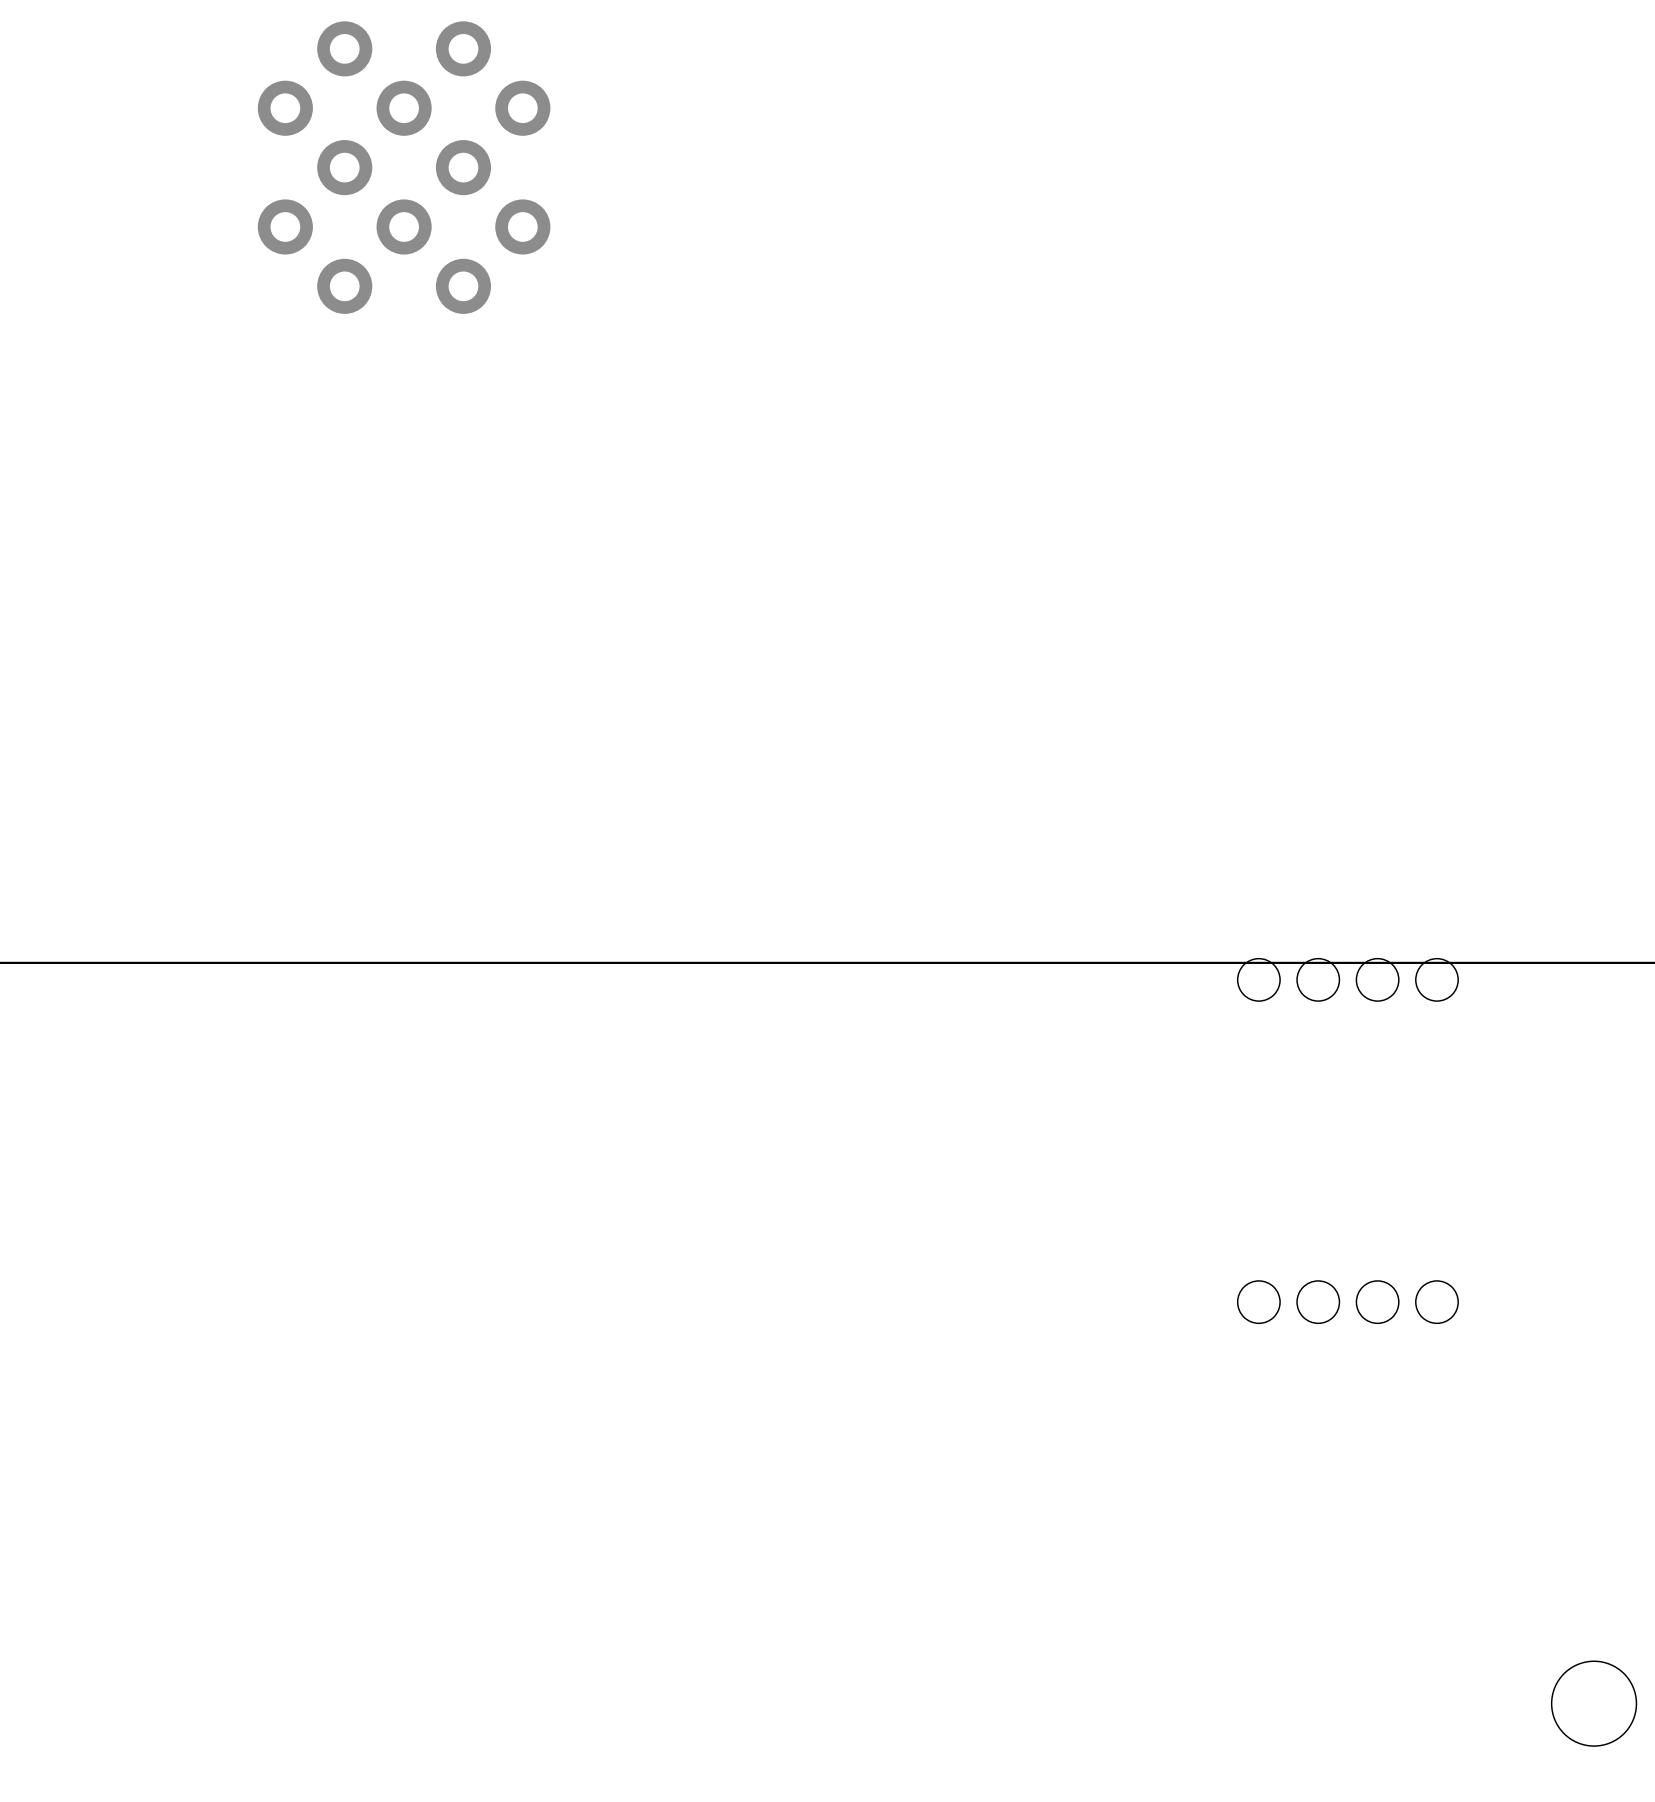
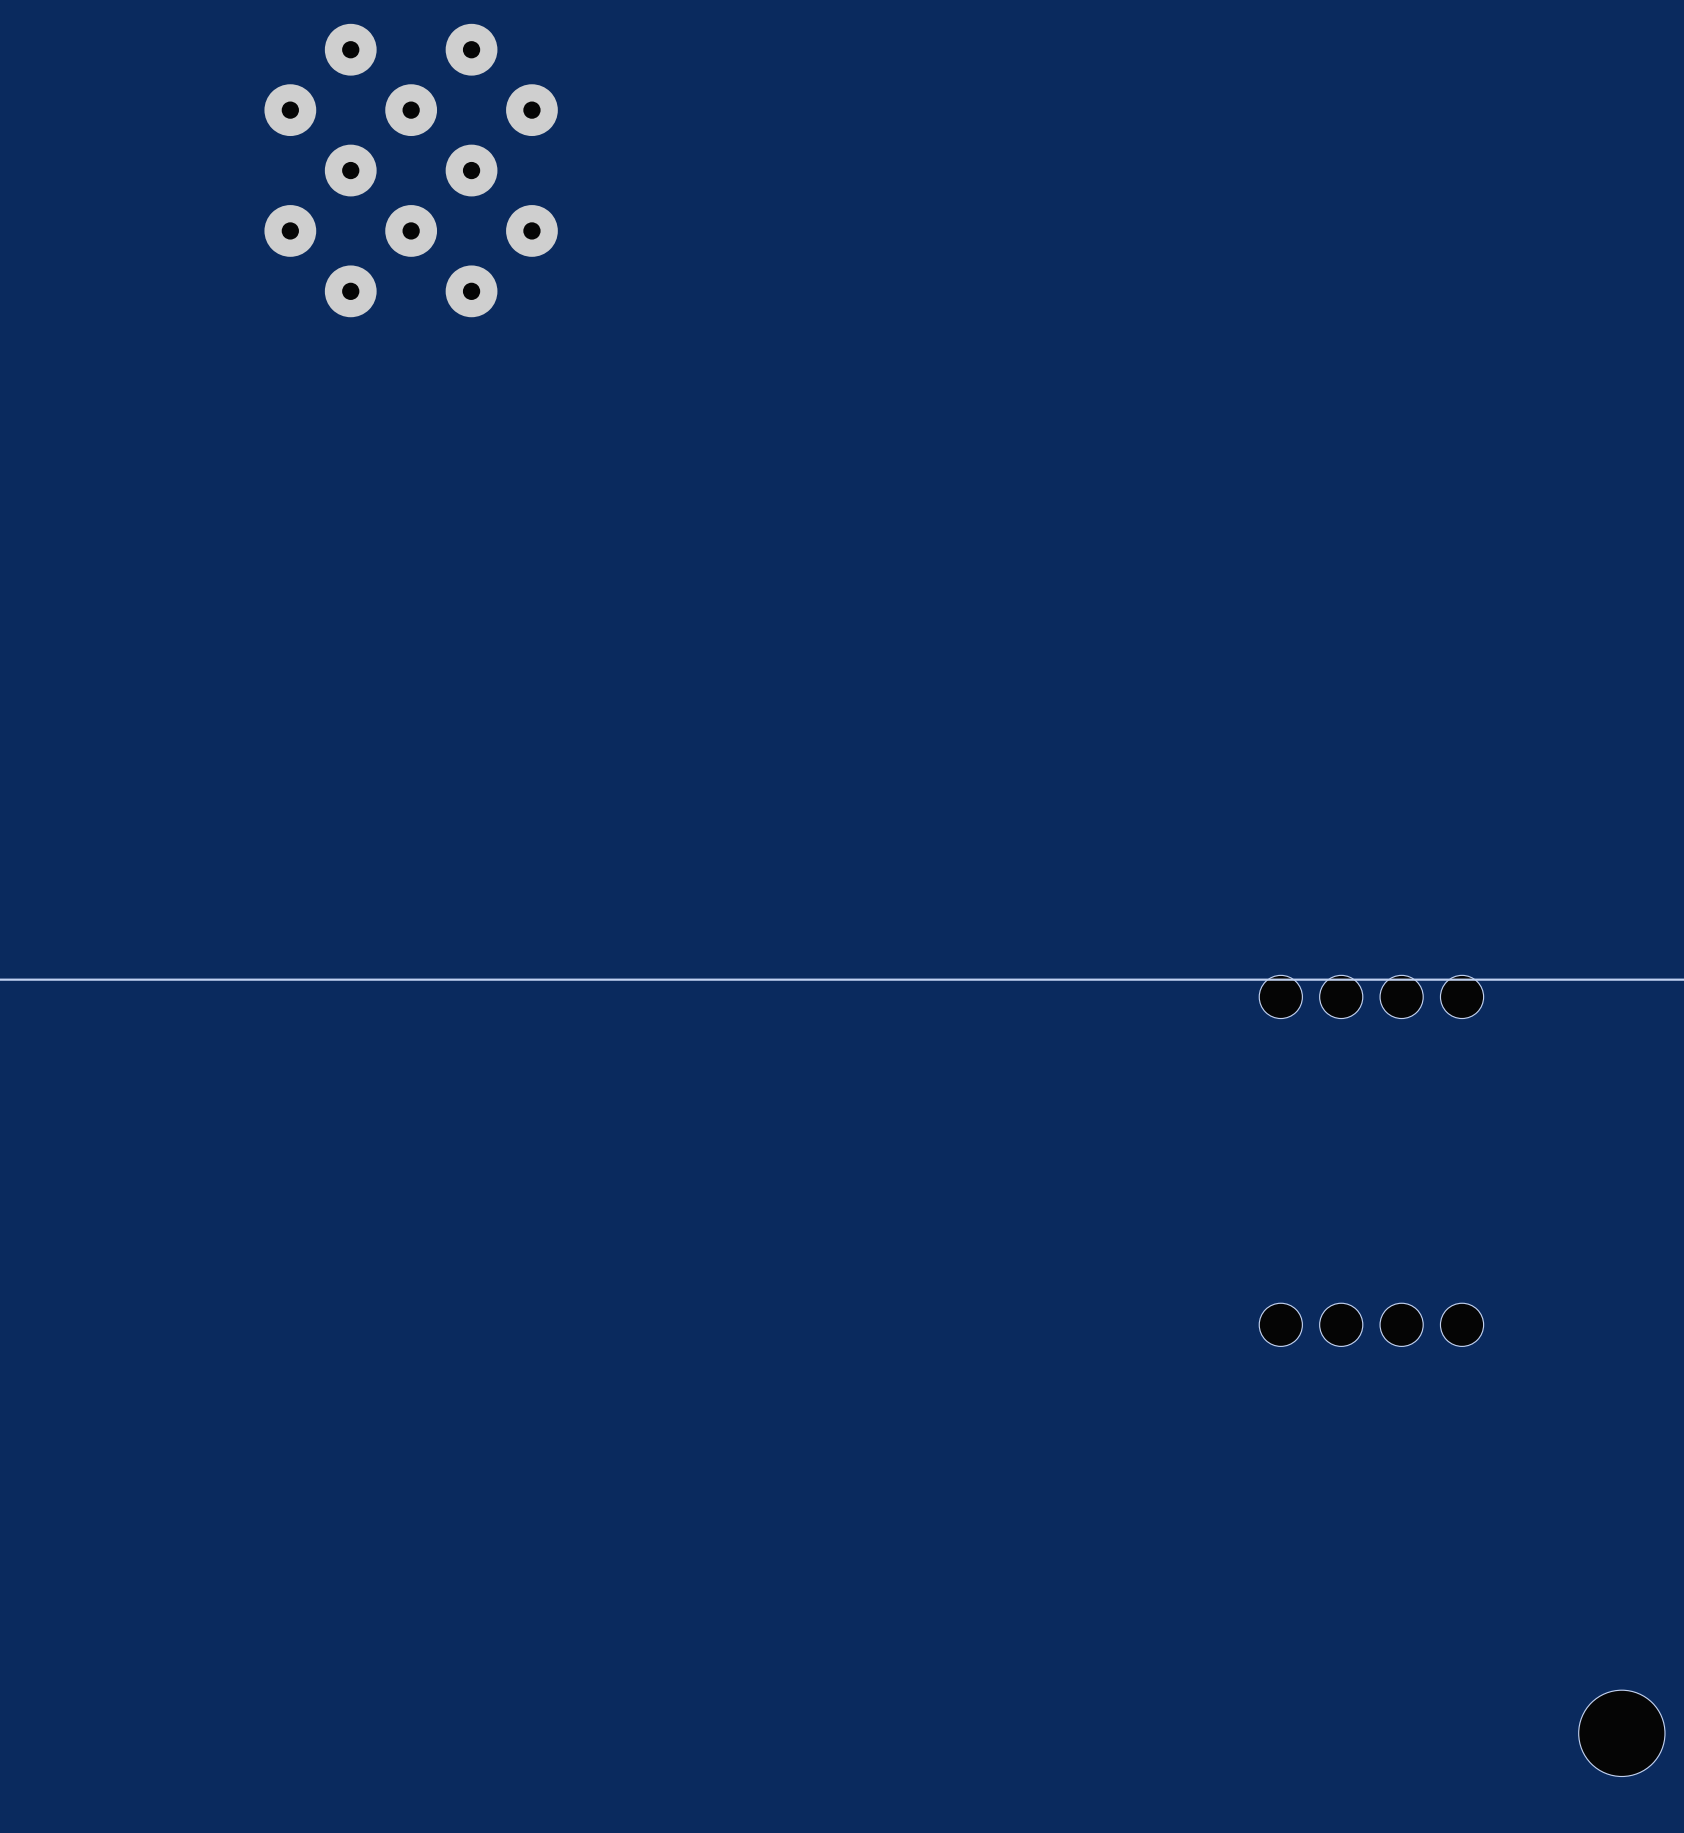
part footprint: [257, 21, 551, 314] -> [264, 23, 558, 318]

